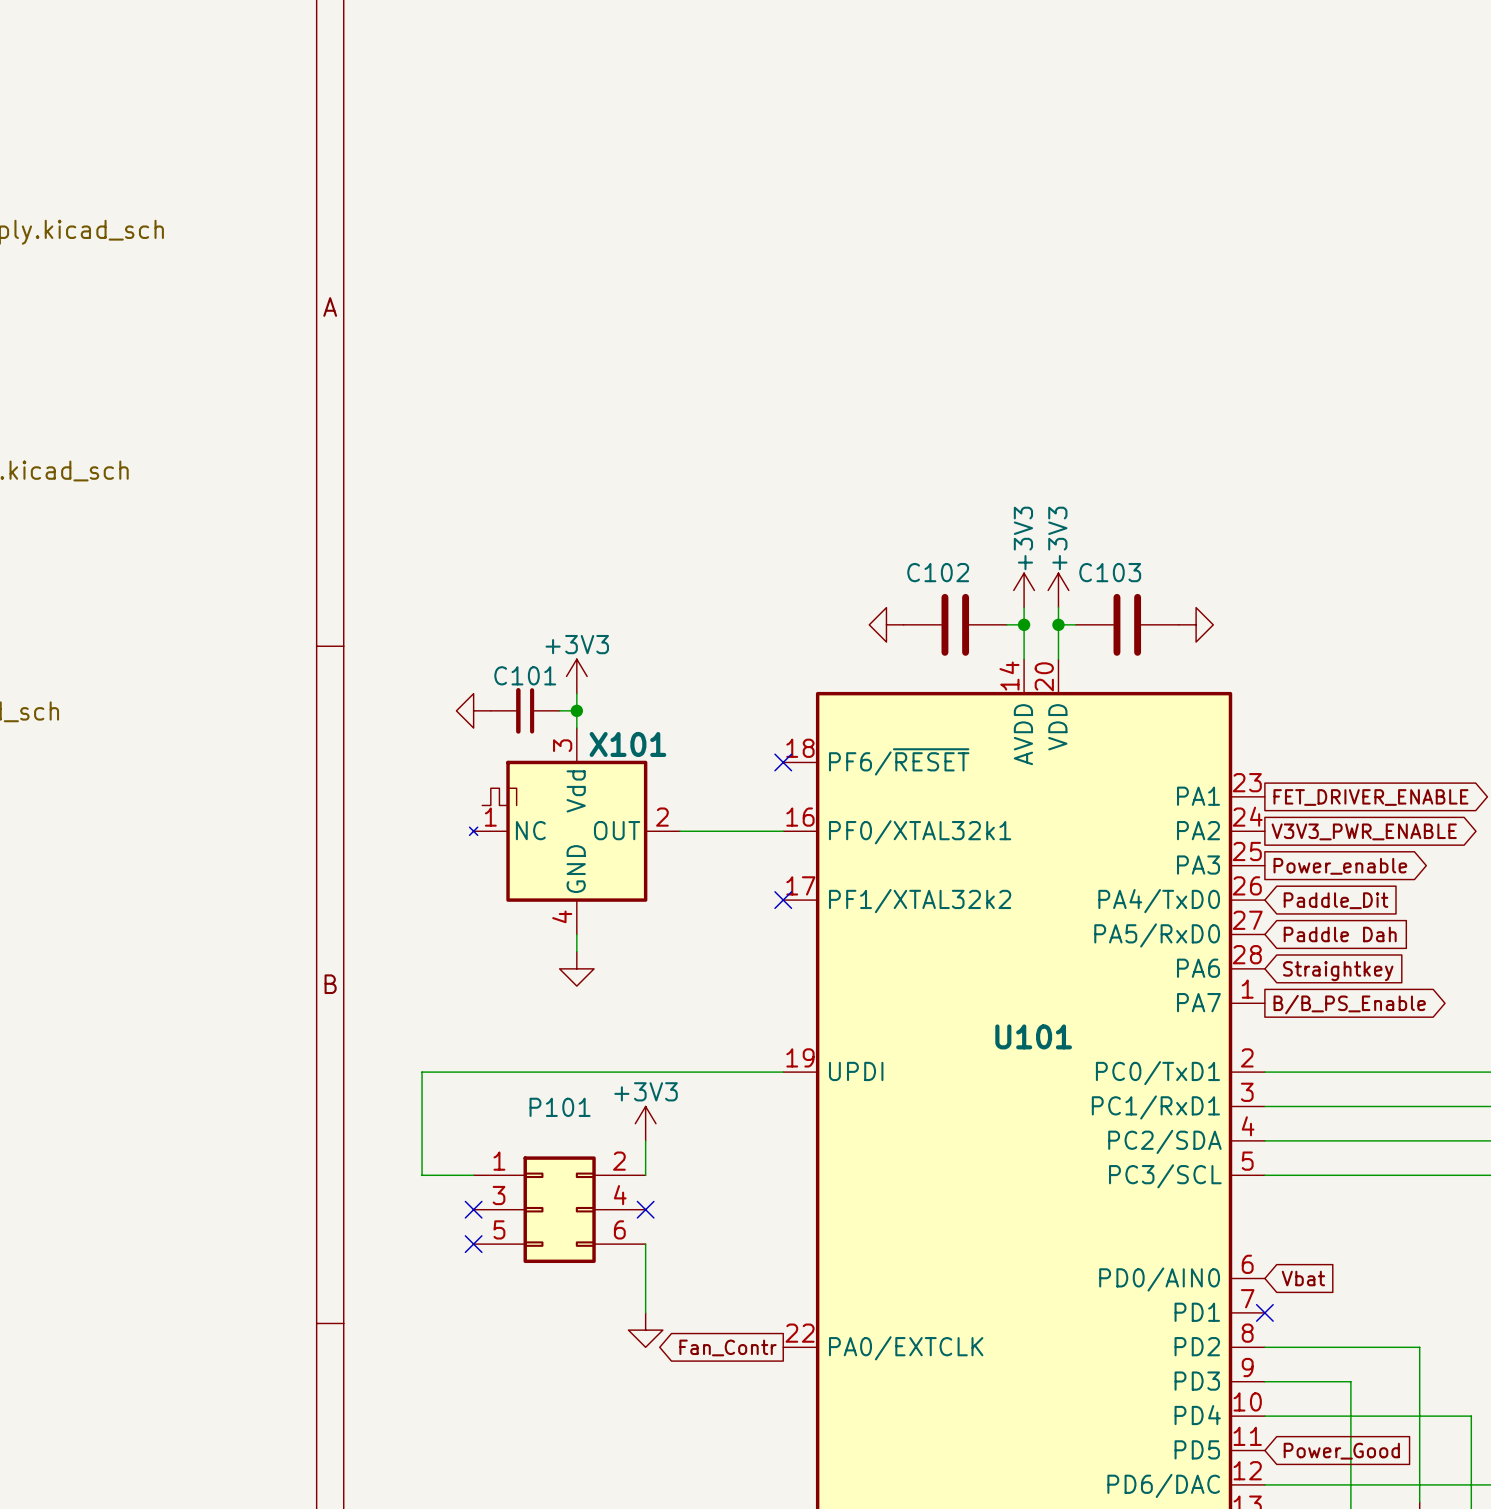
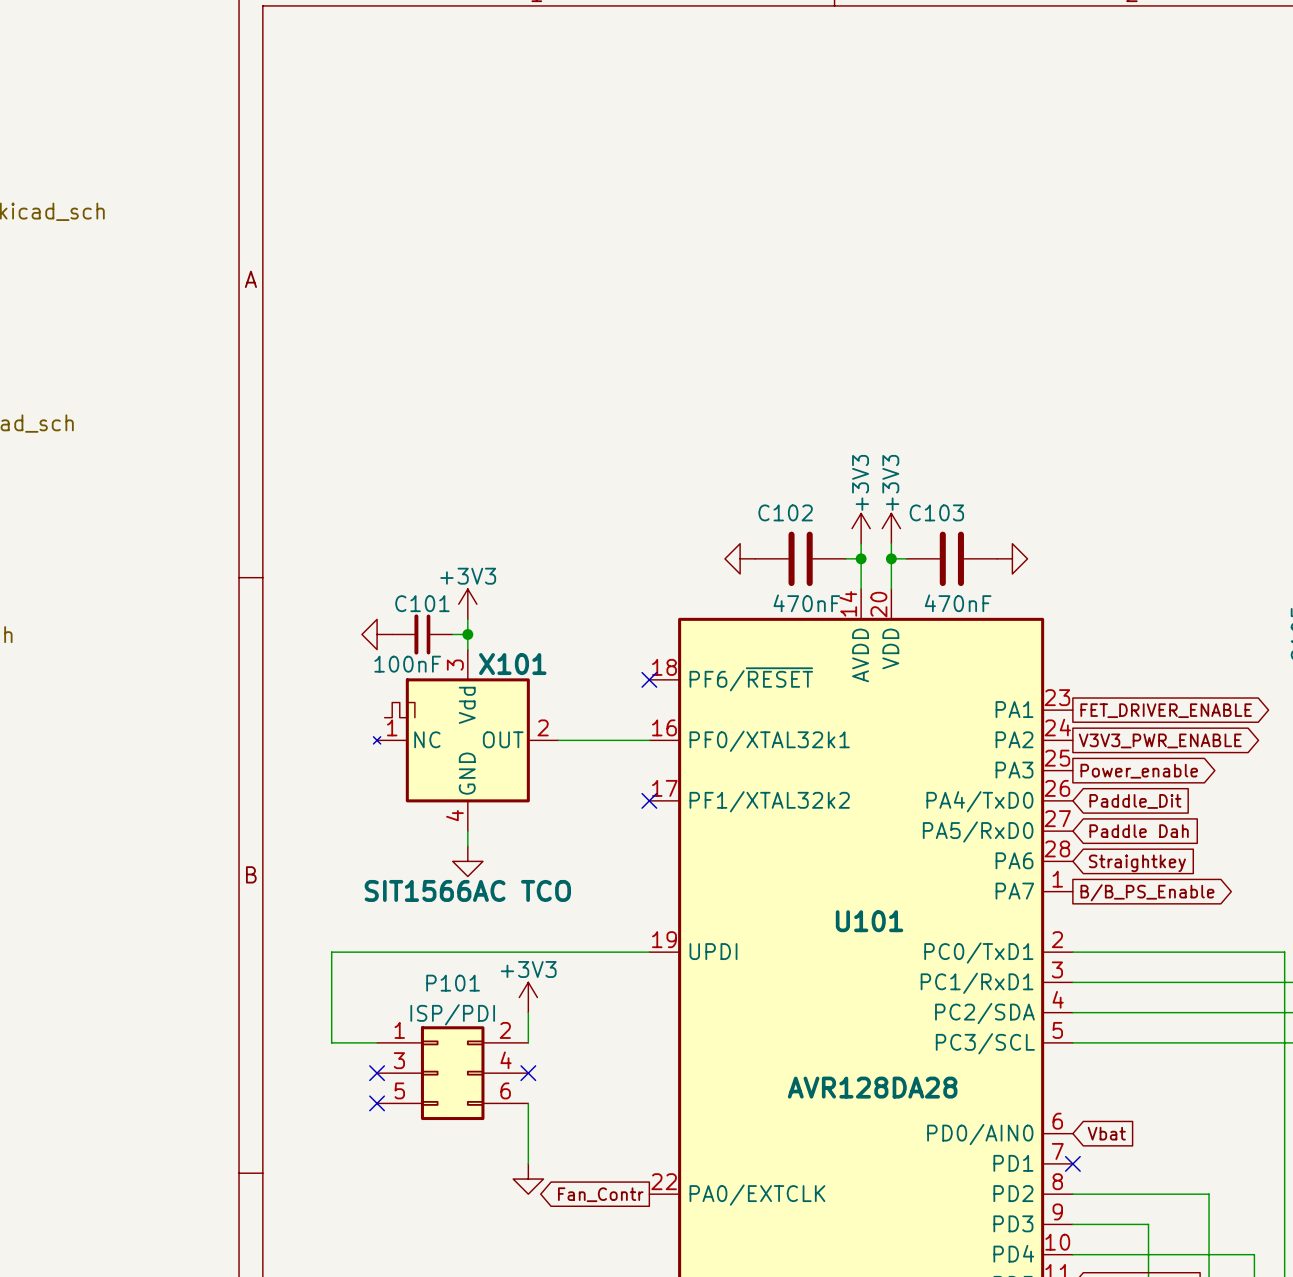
C102 value: none -> 470nF (806, 603)
C103 value: none -> 470nF (958, 603)
C101 value: none -> 100nF (407, 664)
X101 value: none -> SIT1566AC TCO (467, 890)
P101 value: none -> ISP/PDI (452, 1014)
U101 value: none -> AVR128DA28 (872, 1087)

